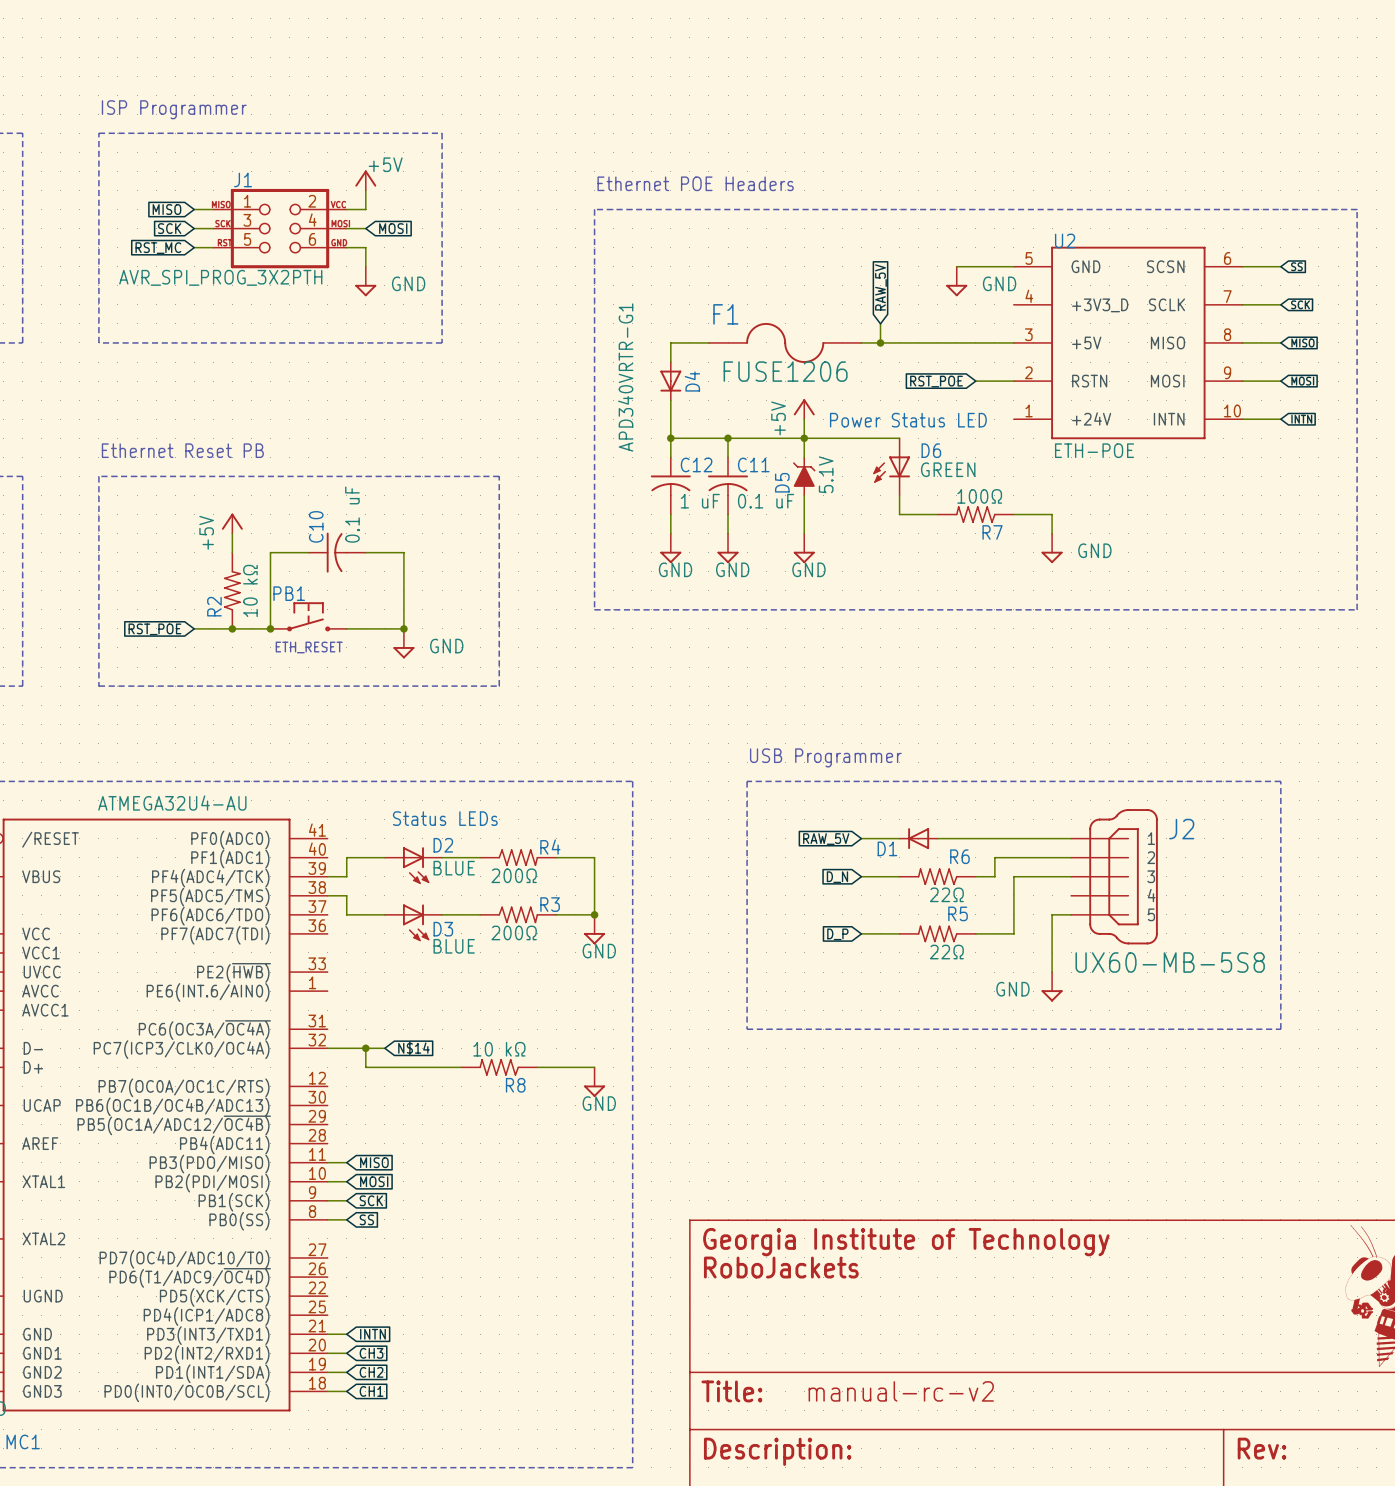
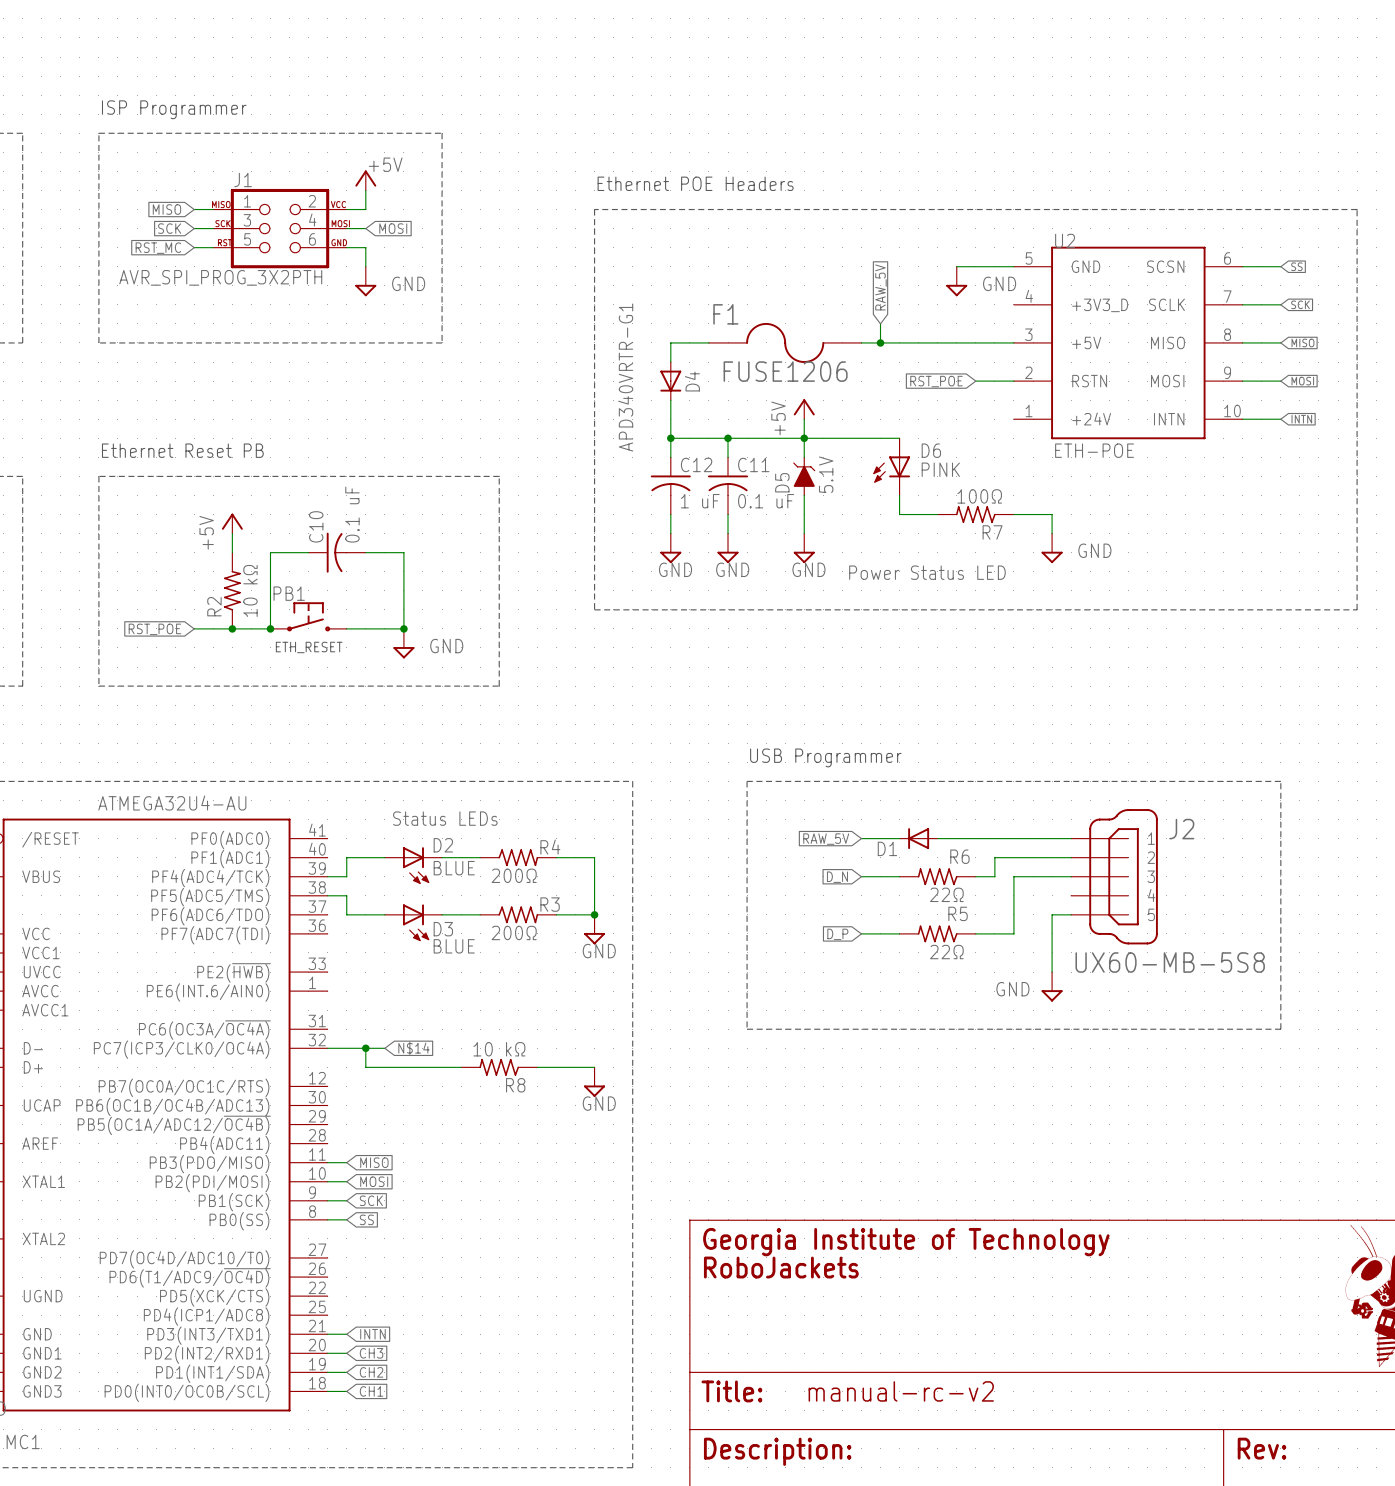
text position: Power Status LED (908, 420) -> Power Status LED (927, 572)
D6 value: GREEN (948, 469) -> PINK (940, 469)

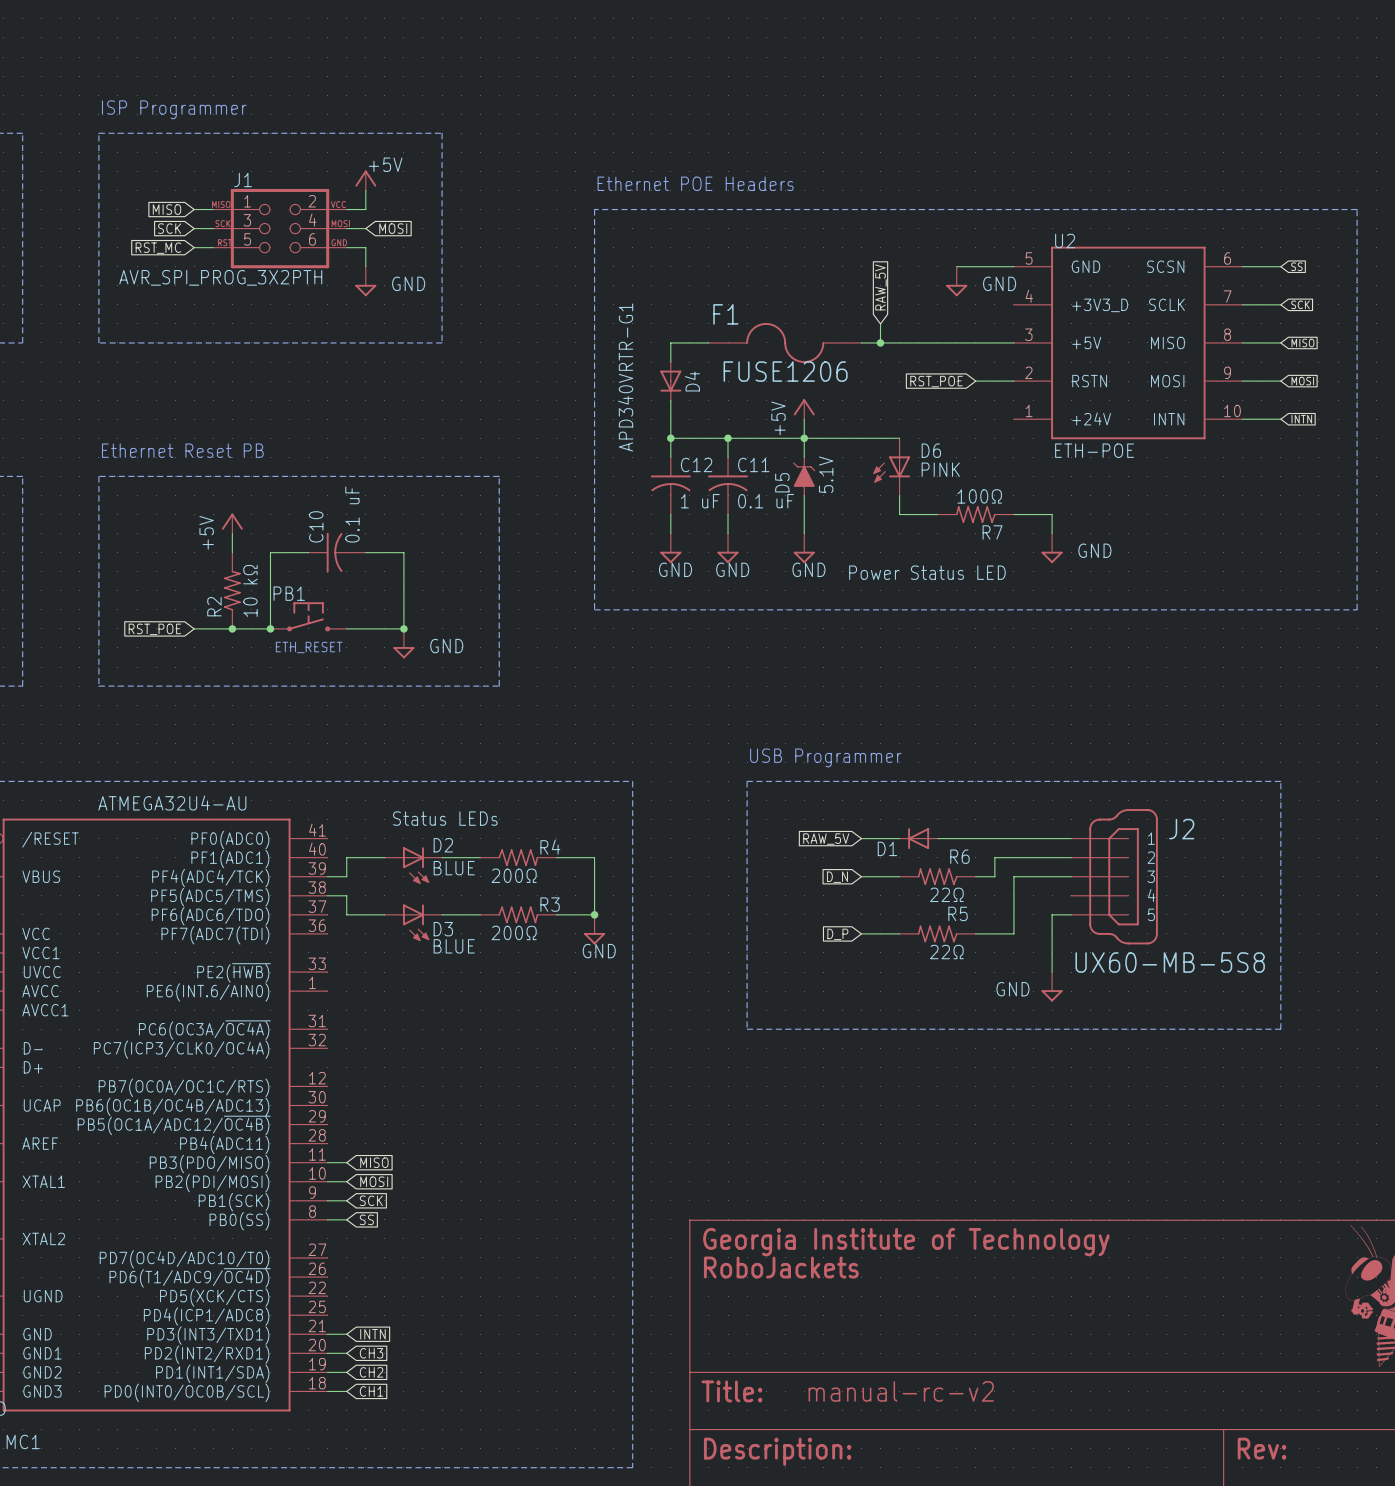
wire: (327, 1048) (384, 1048) -> none
wire: (365, 1048) (365, 1067) (461, 1067) -> none
junction: (365, 1048) -> none
global label: N$14 (413, 1048) -> none
R8: 10 kΩ (499, 1067) -> none
wire: (537, 1067) (594, 1067) -> none
power symbol: GND (594, 1082) -> none

